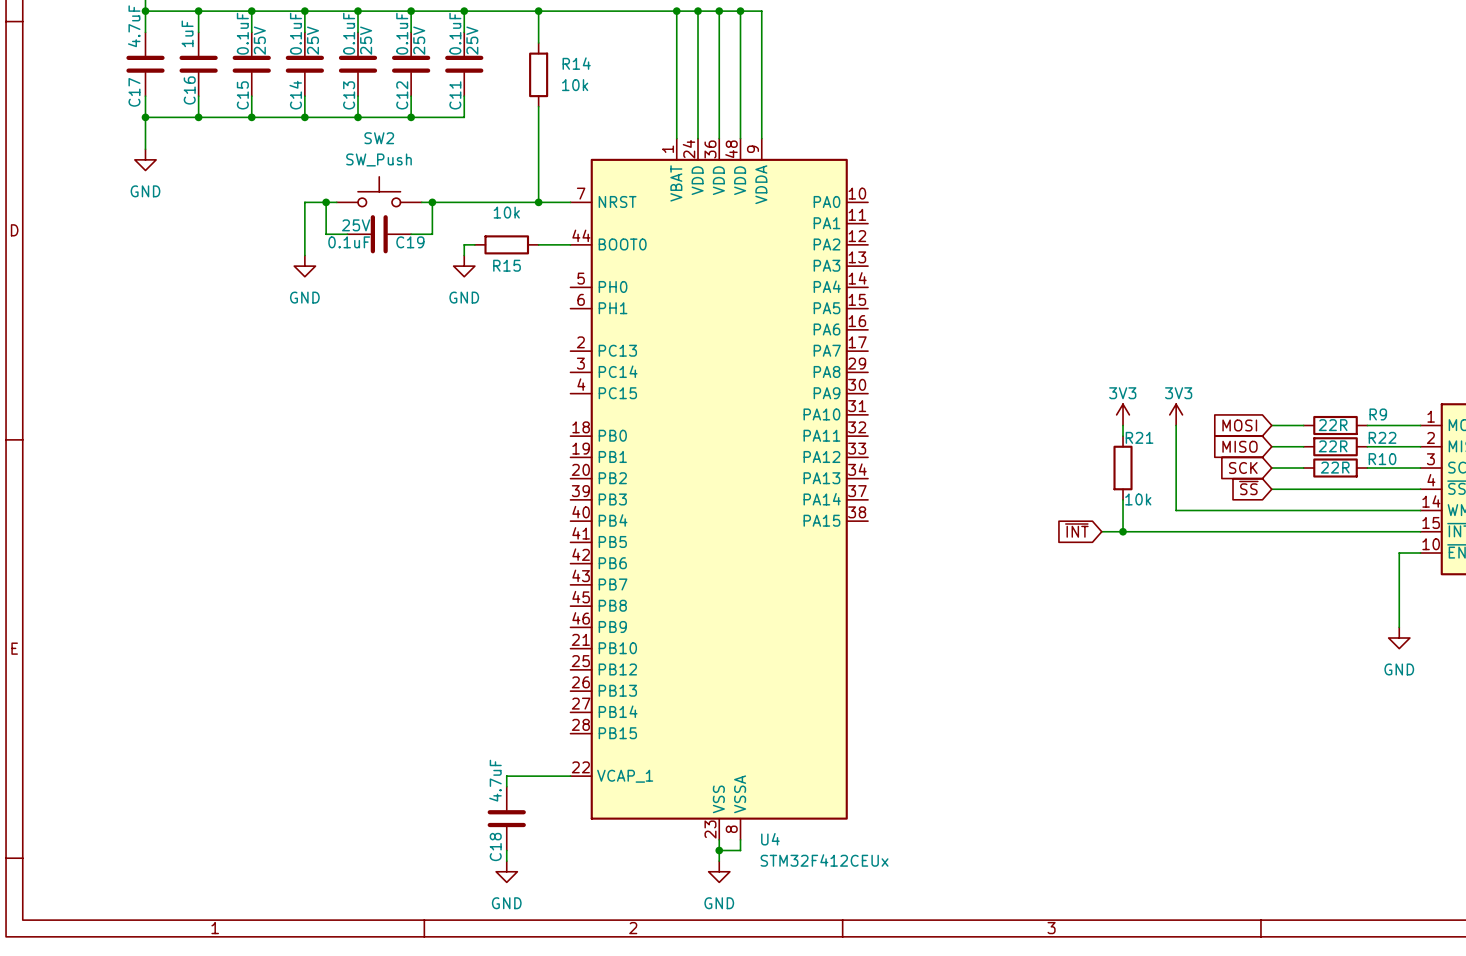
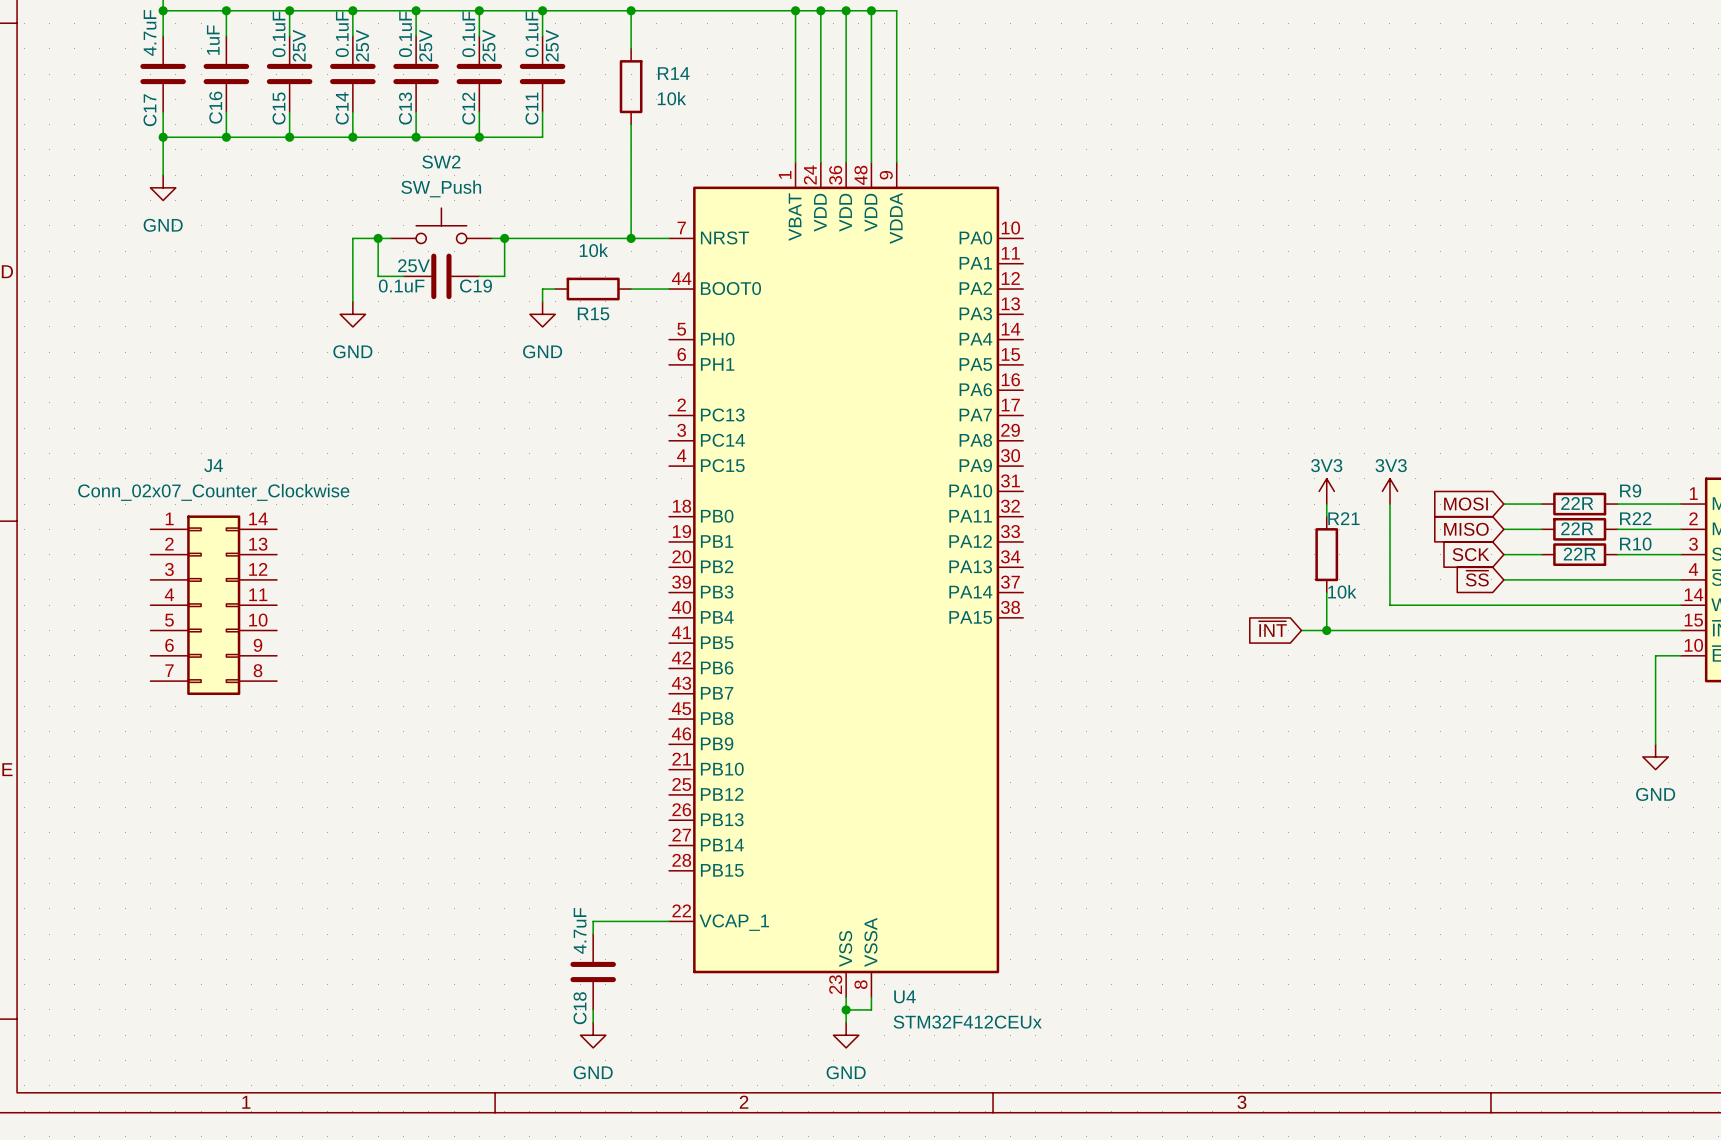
J4: none -> Conn_02x07_Counter_Clockwise (213, 605)

